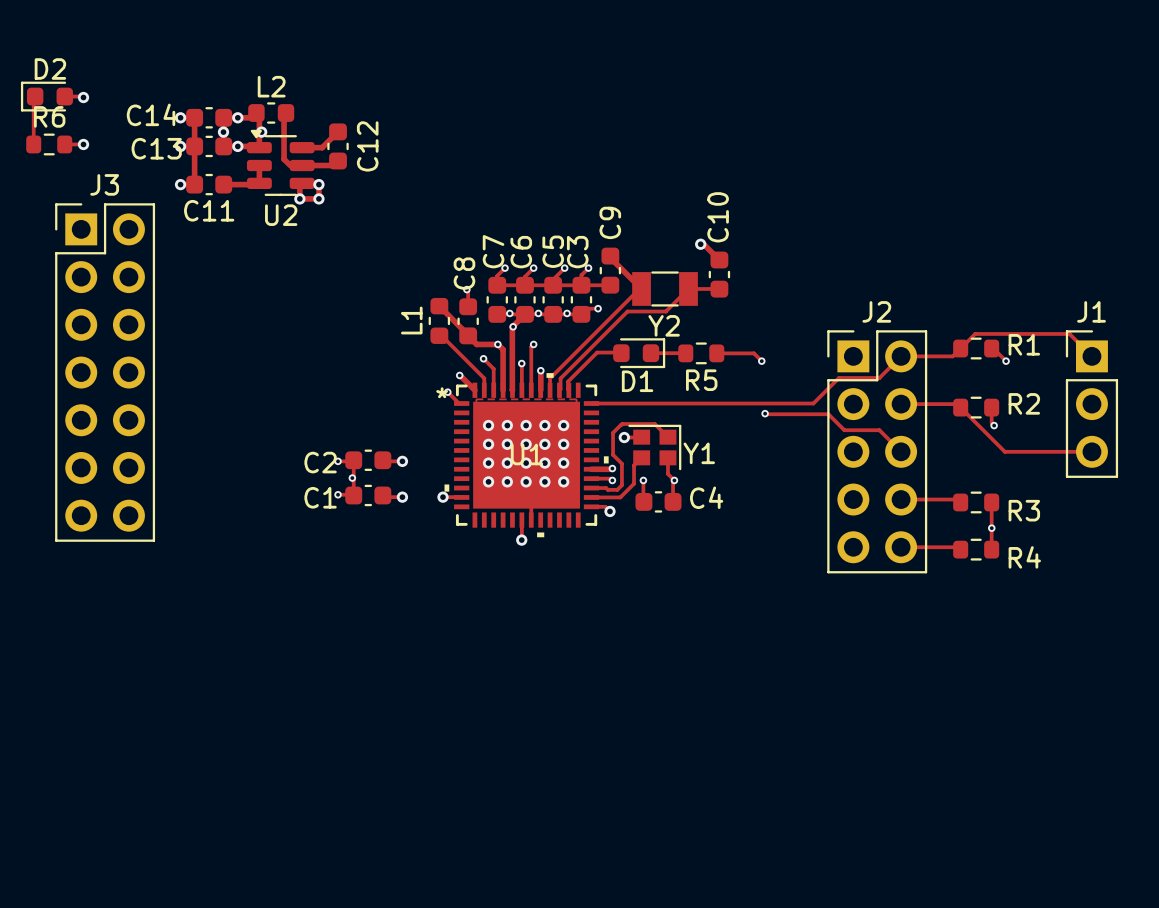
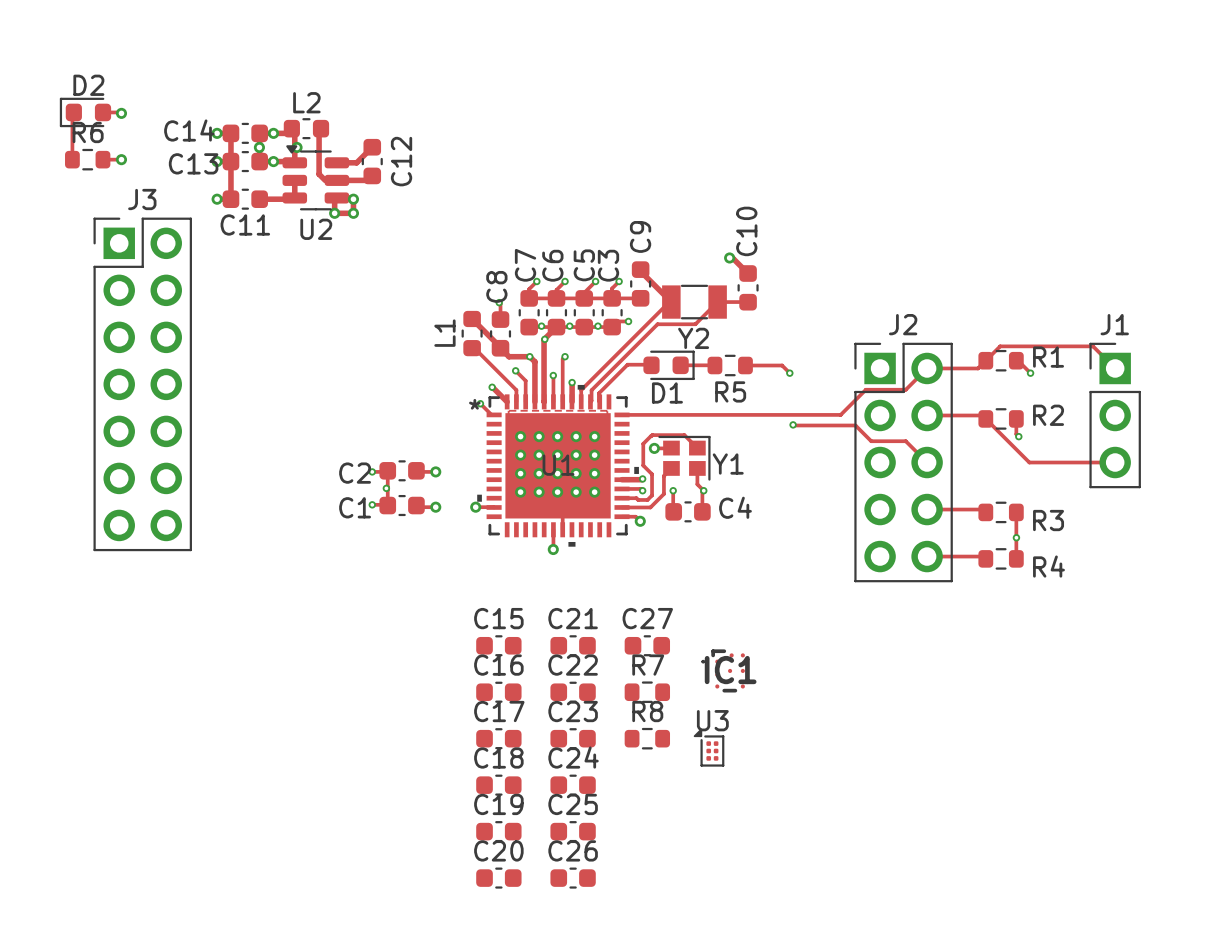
C15: none -> (498, 645)
C21: none -> (573, 645)
C27: none -> (647, 645)
IC1: none -> (723, 670)
C16: none -> (498, 692)
C22: none -> (573, 692)
R7: none -> (647, 692)
C17: none -> (498, 738)
C23: none -> (573, 738)
R8: none -> (647, 738)
U3: none -> (709, 747)
C18: none -> (498, 785)
C24: none -> (573, 785)
C19: none -> (498, 831)
C25: none -> (573, 831)
C20: none -> (498, 878)
C26: none -> (573, 878)

